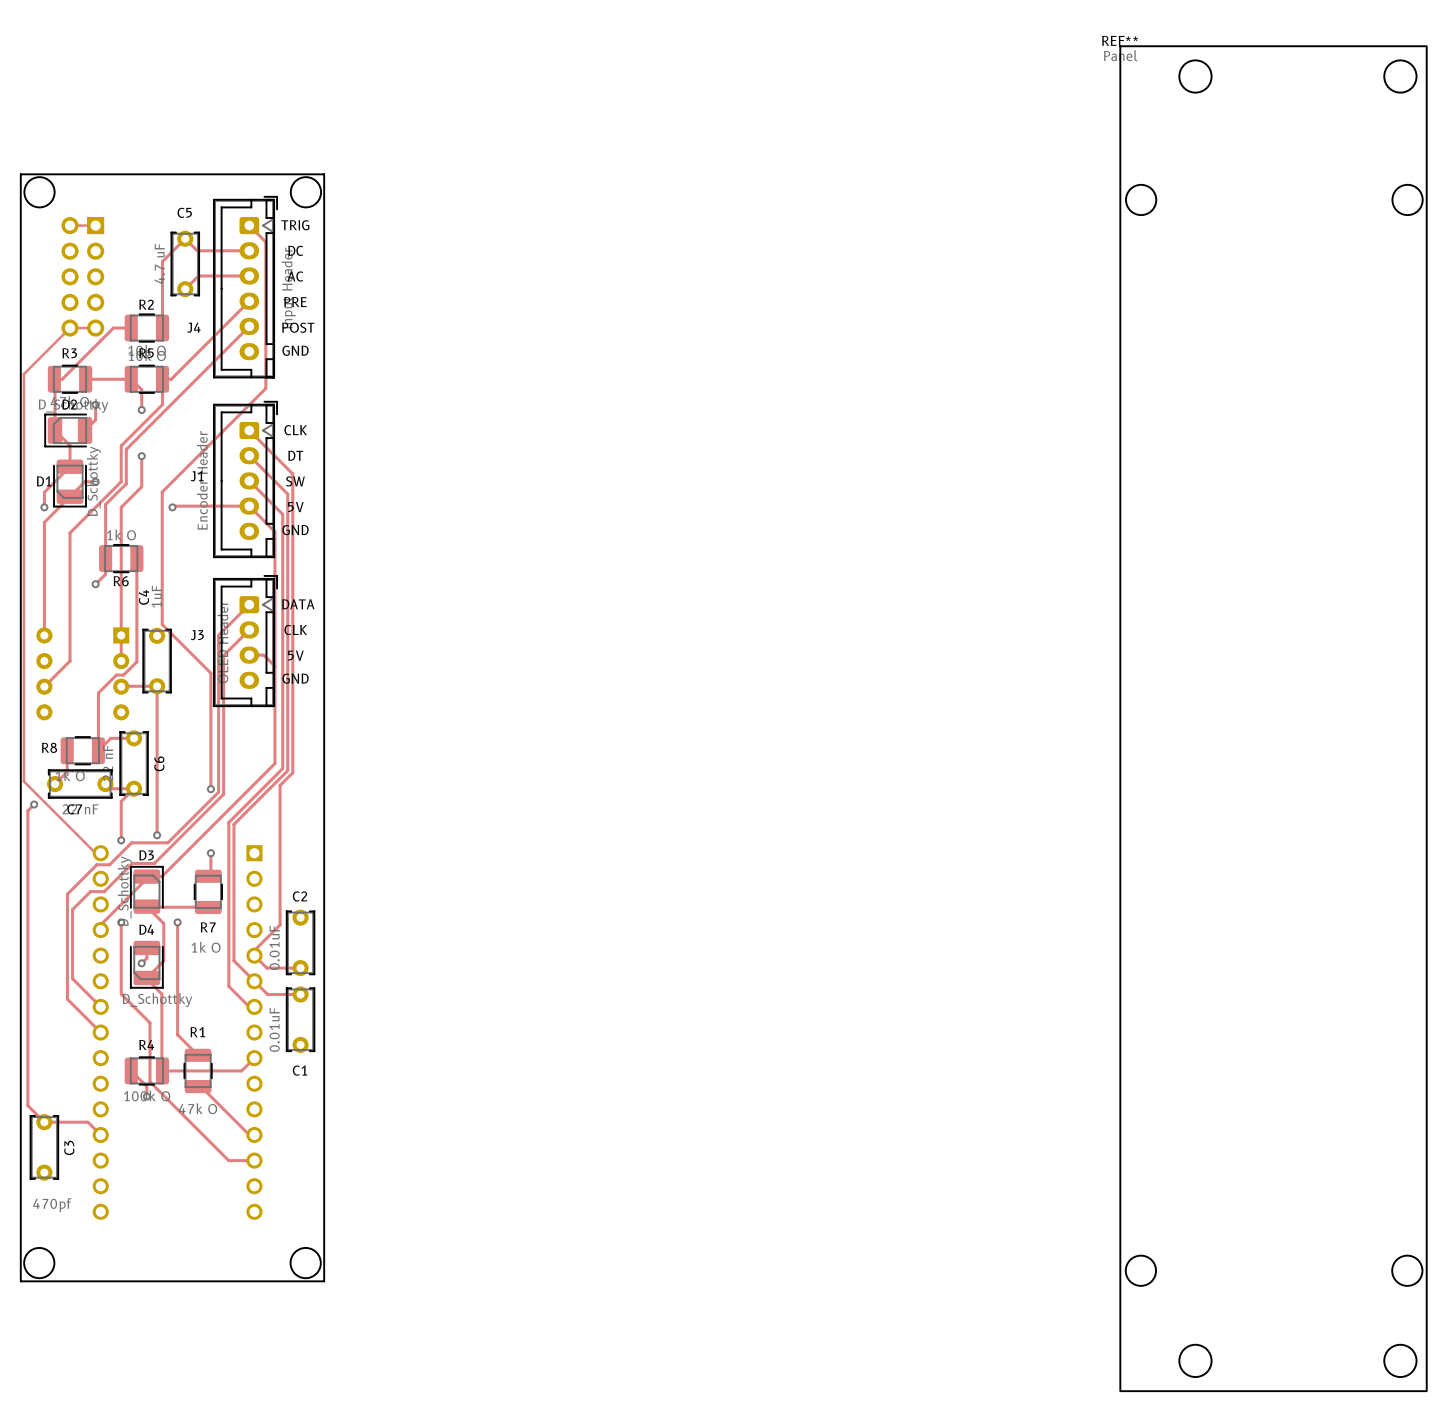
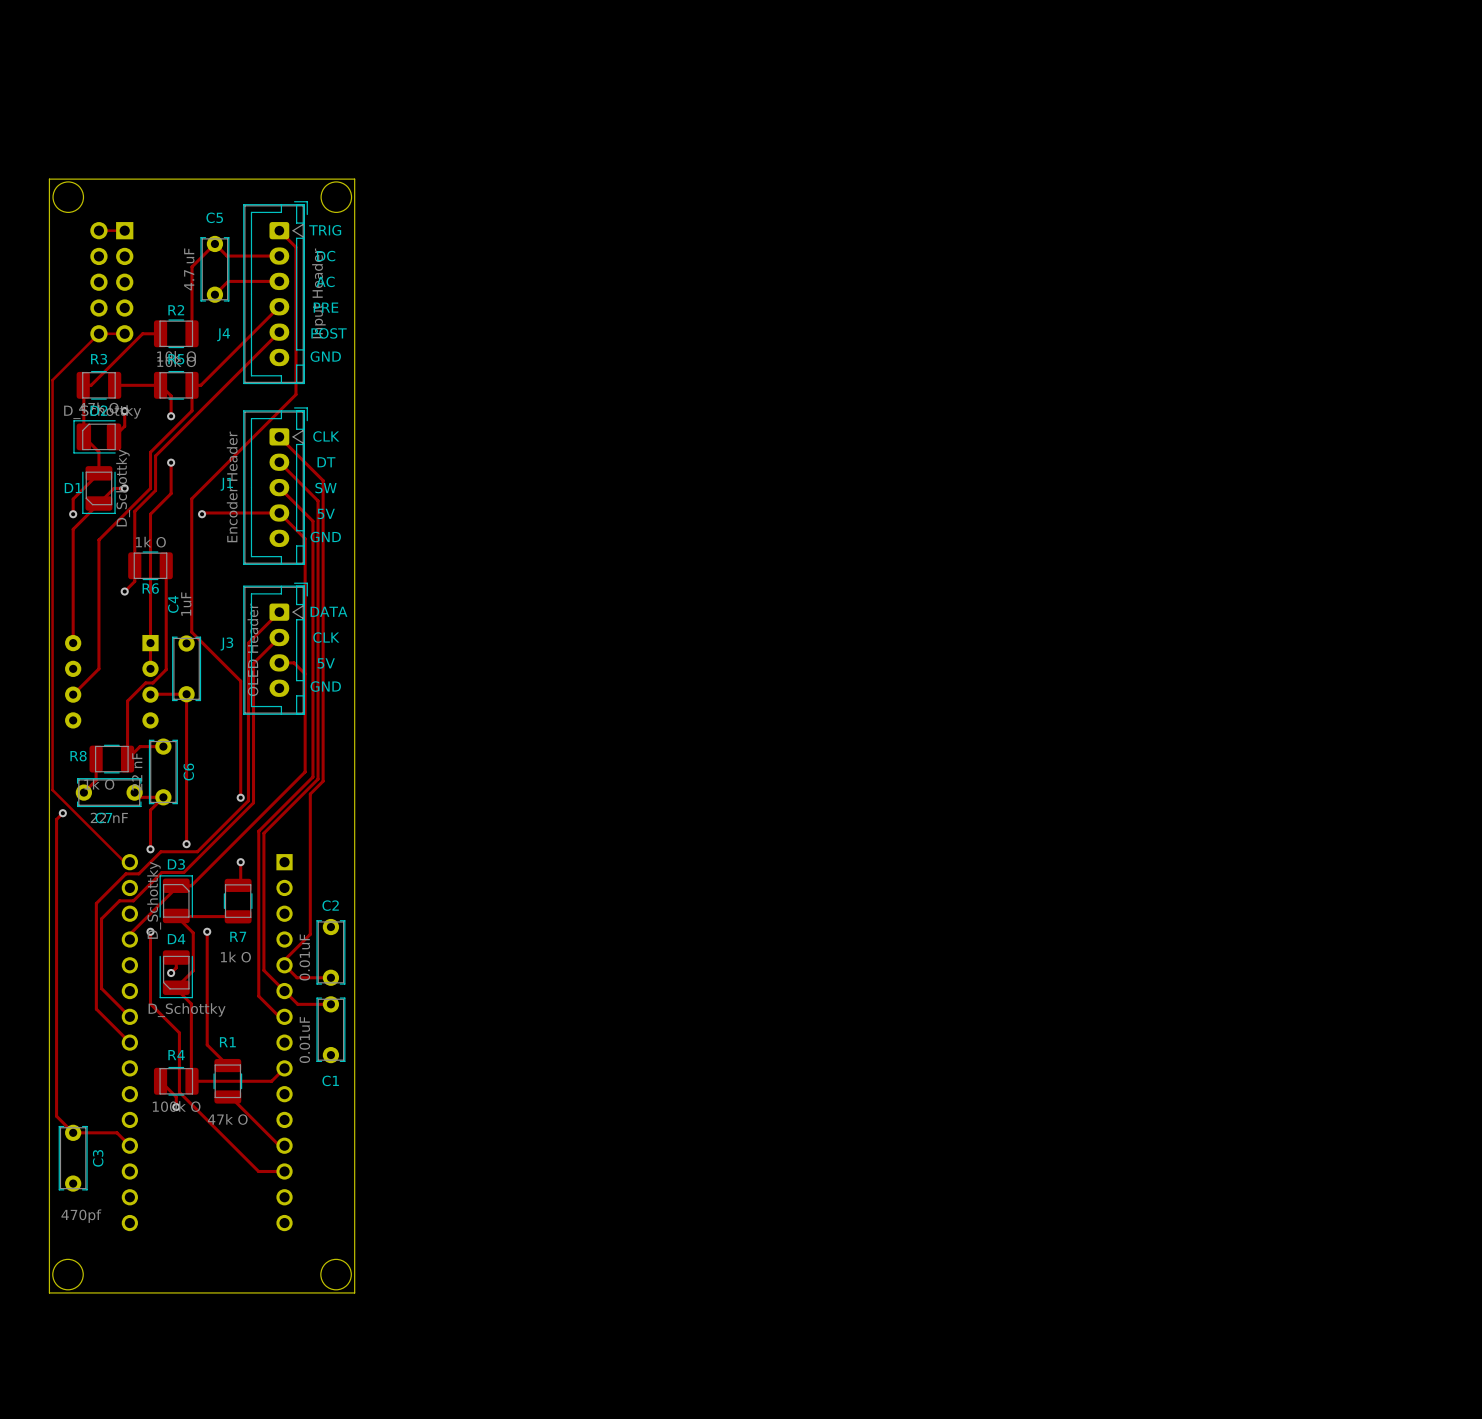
round board edge: [1125, 184, 1157, 216] -> none
round board edge: [1391, 184, 1424, 216] -> none
REF**: Panel (1273, 718) -> none
round board edge: [1125, 1255, 1157, 1287] -> none
round board edge: [1391, 1255, 1423, 1287] -> none

